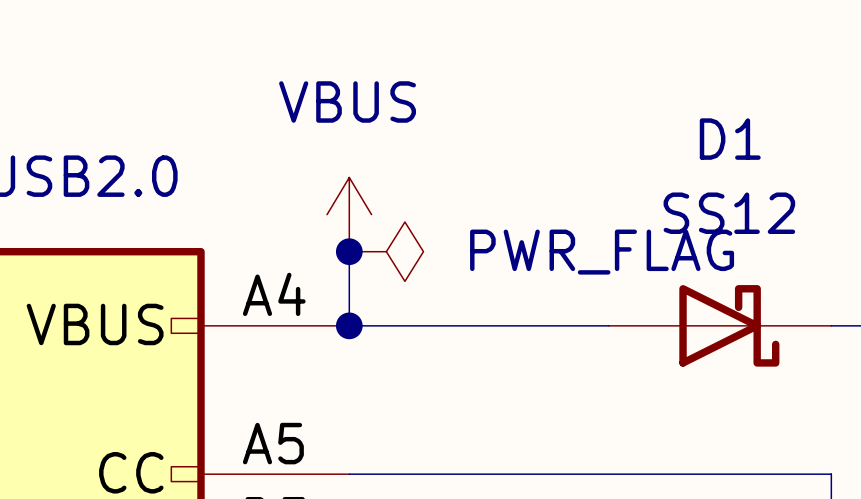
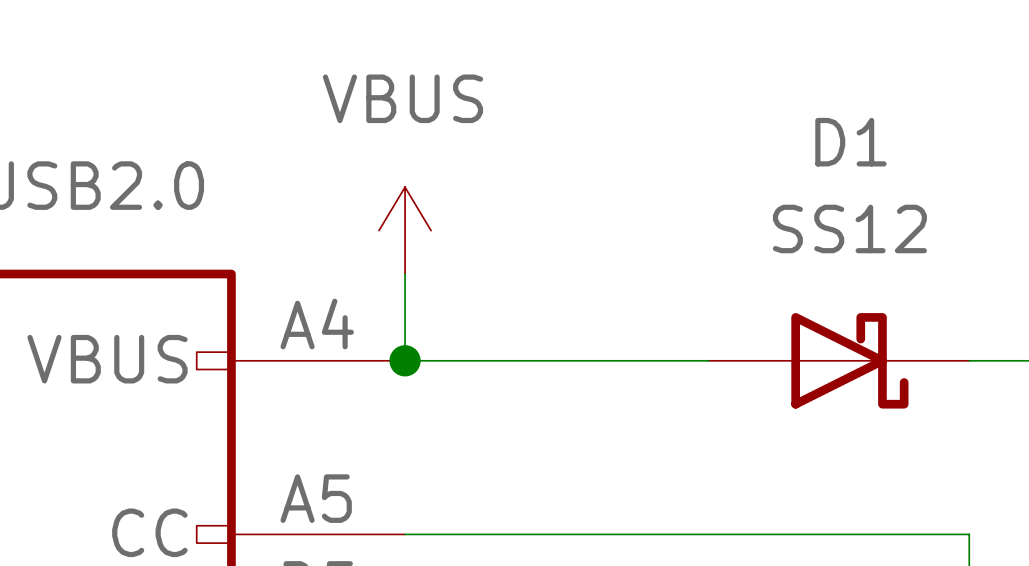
junction: (349, 251) -> none
power symbol: PWR_FLAG (386, 251) -> none

